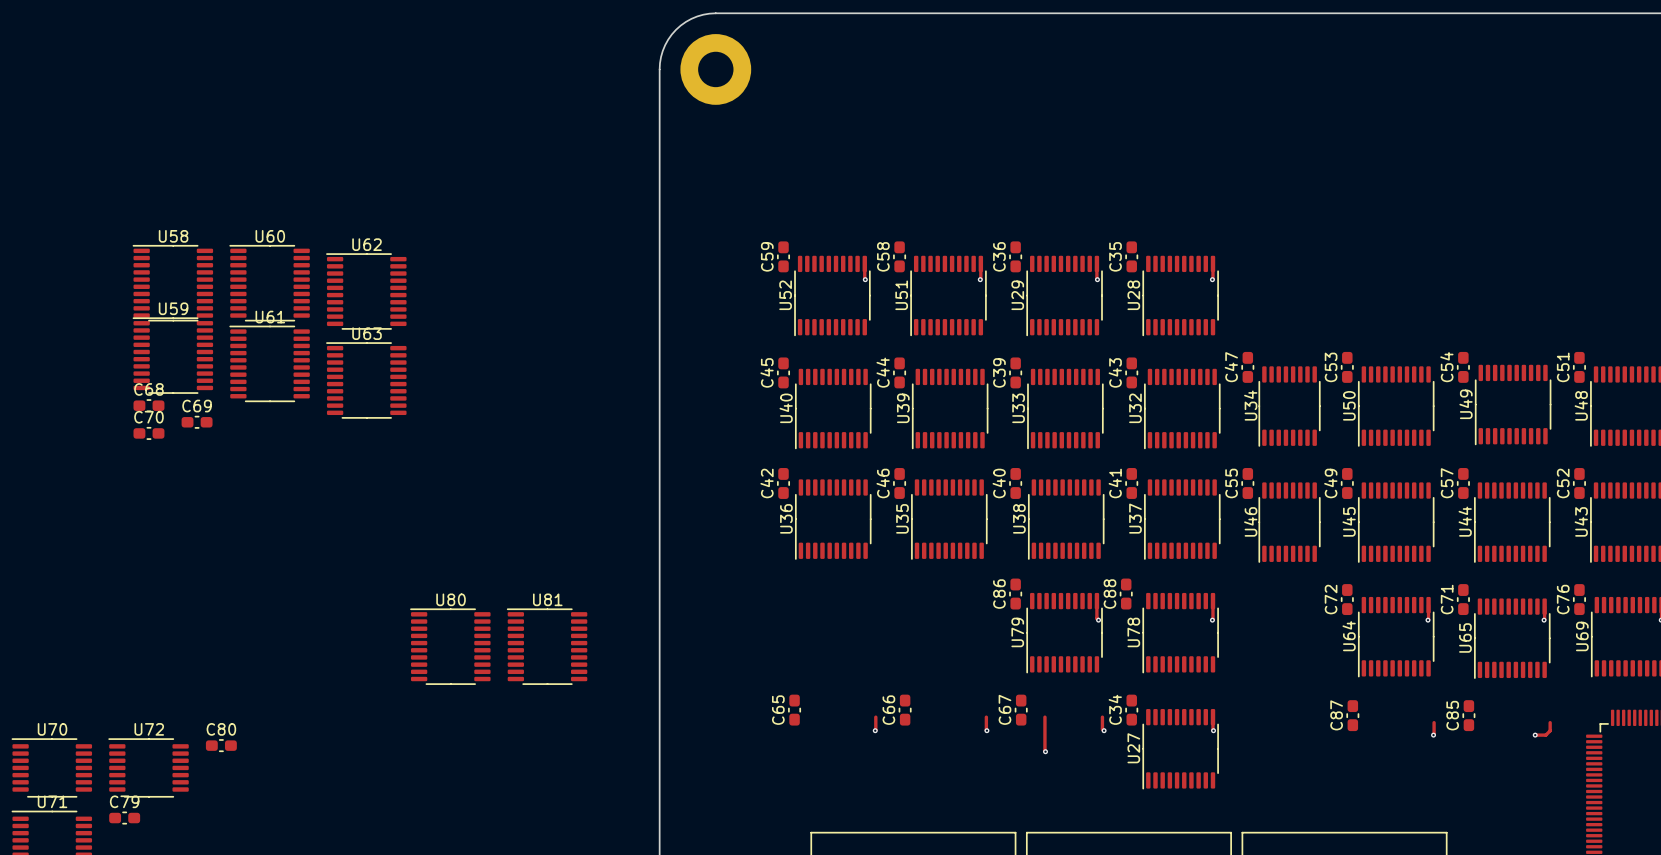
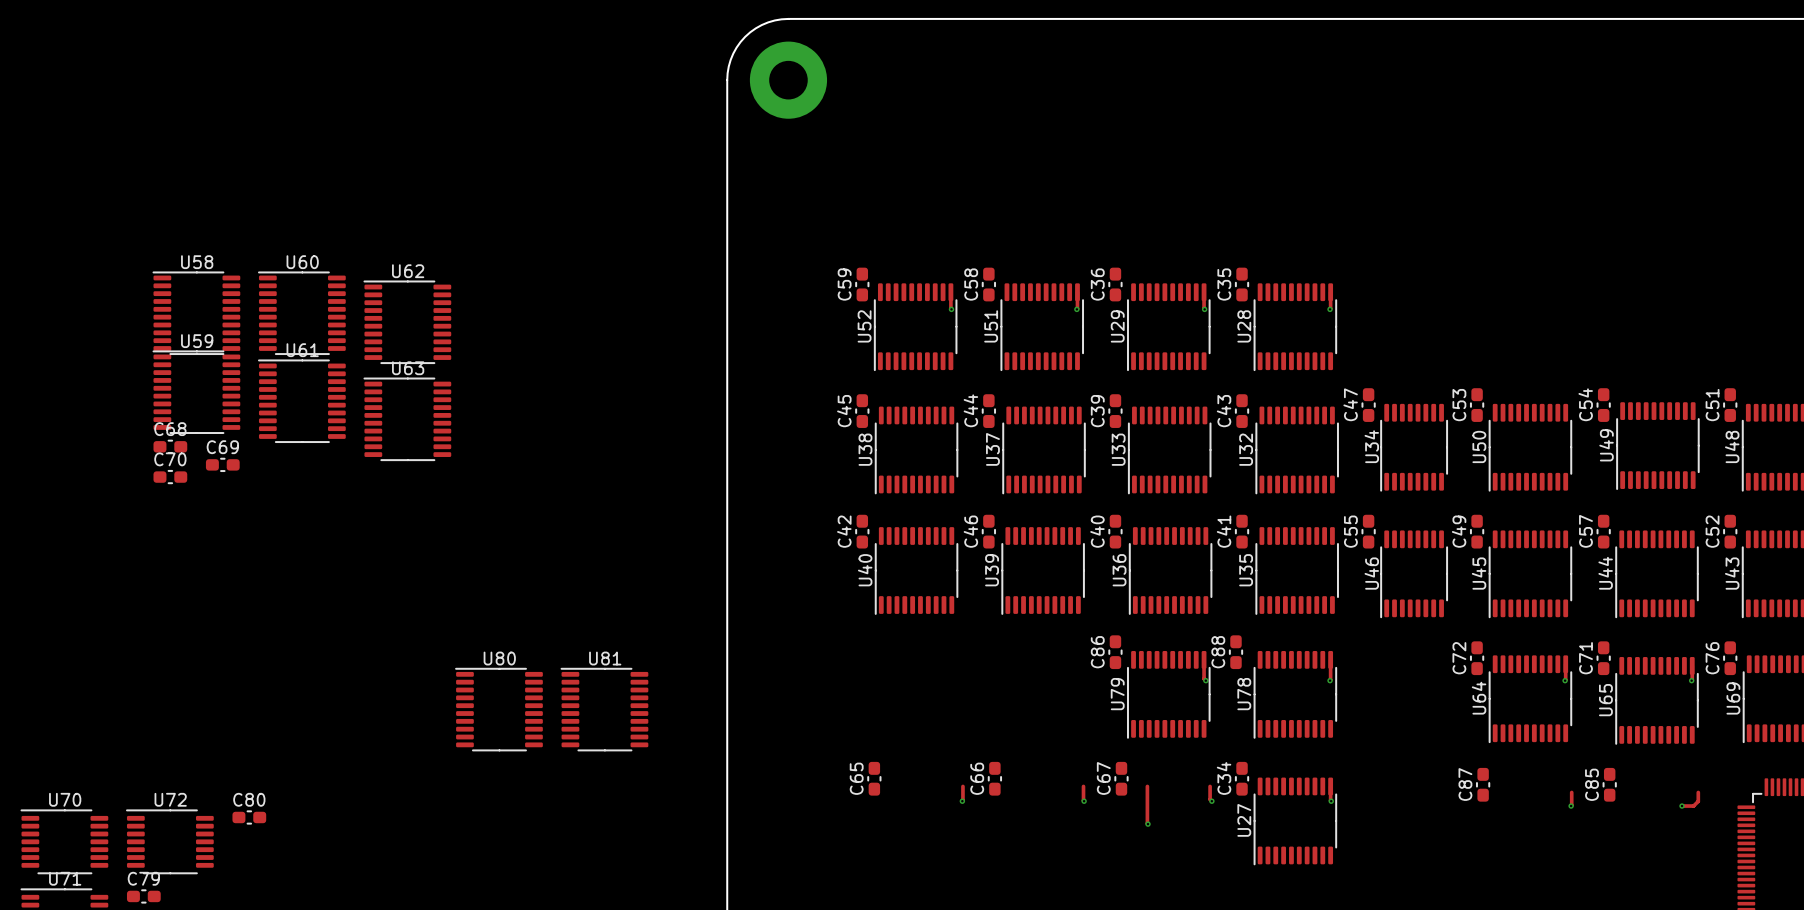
U40 name: U40 (786, 408) -> U38 (865, 449)
U39 name: U39 (903, 408) -> U37 (992, 449)
U36 name: U36 (786, 518) -> U40 (865, 570)
U35 name: U35 (902, 518) -> U39 (992, 570)
U38 name: U38 (1019, 518) -> U36 (1119, 570)
U37 name: U37 (1135, 518) -> U35 (1246, 570)

